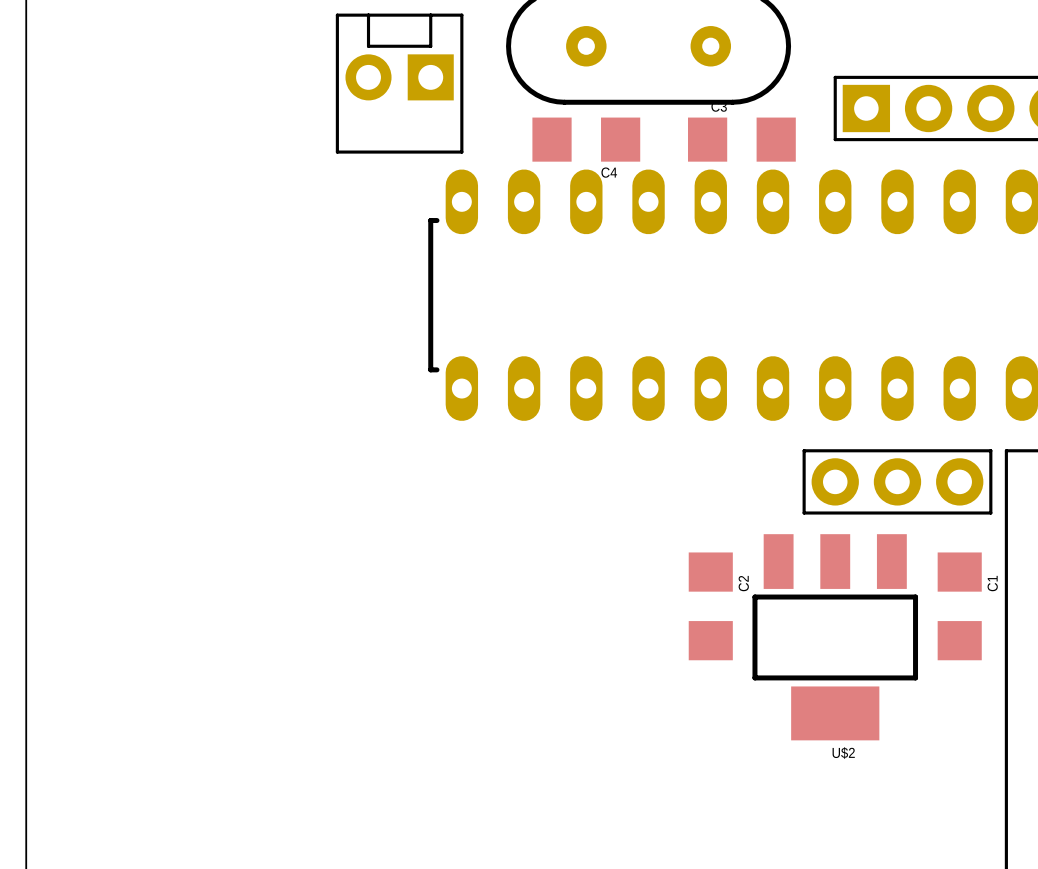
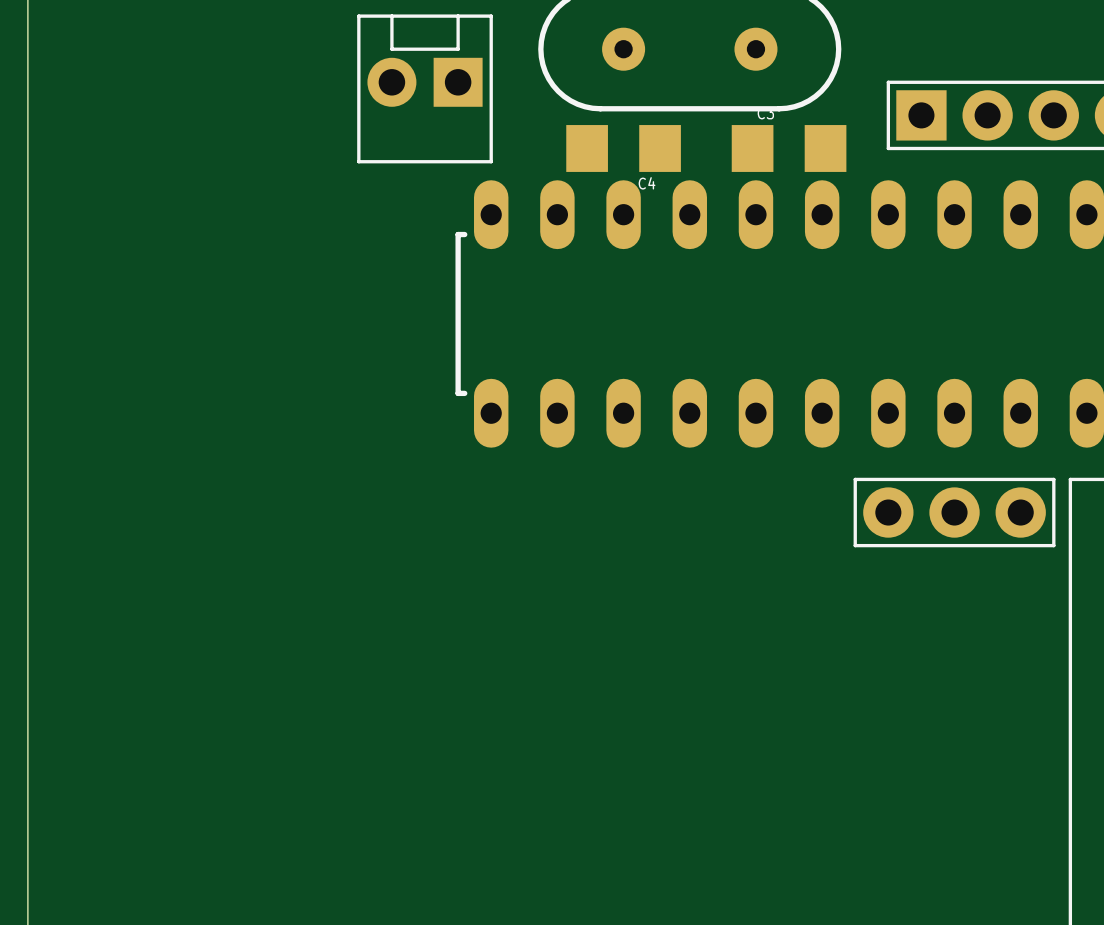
C2: (710, 606) -> none
C1: (959, 606) -> none
U$2: (835, 637) -> none

